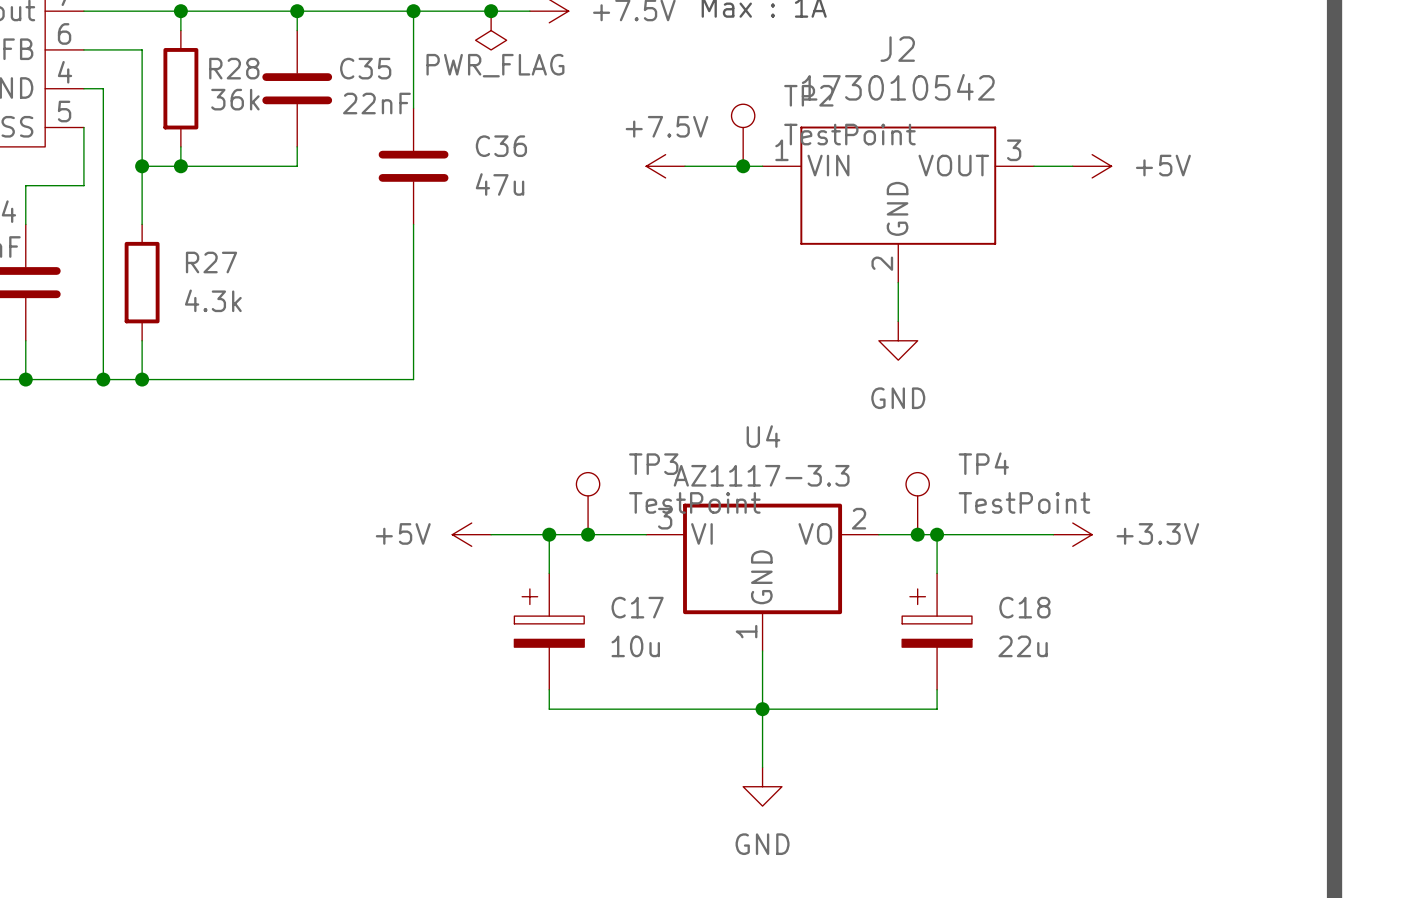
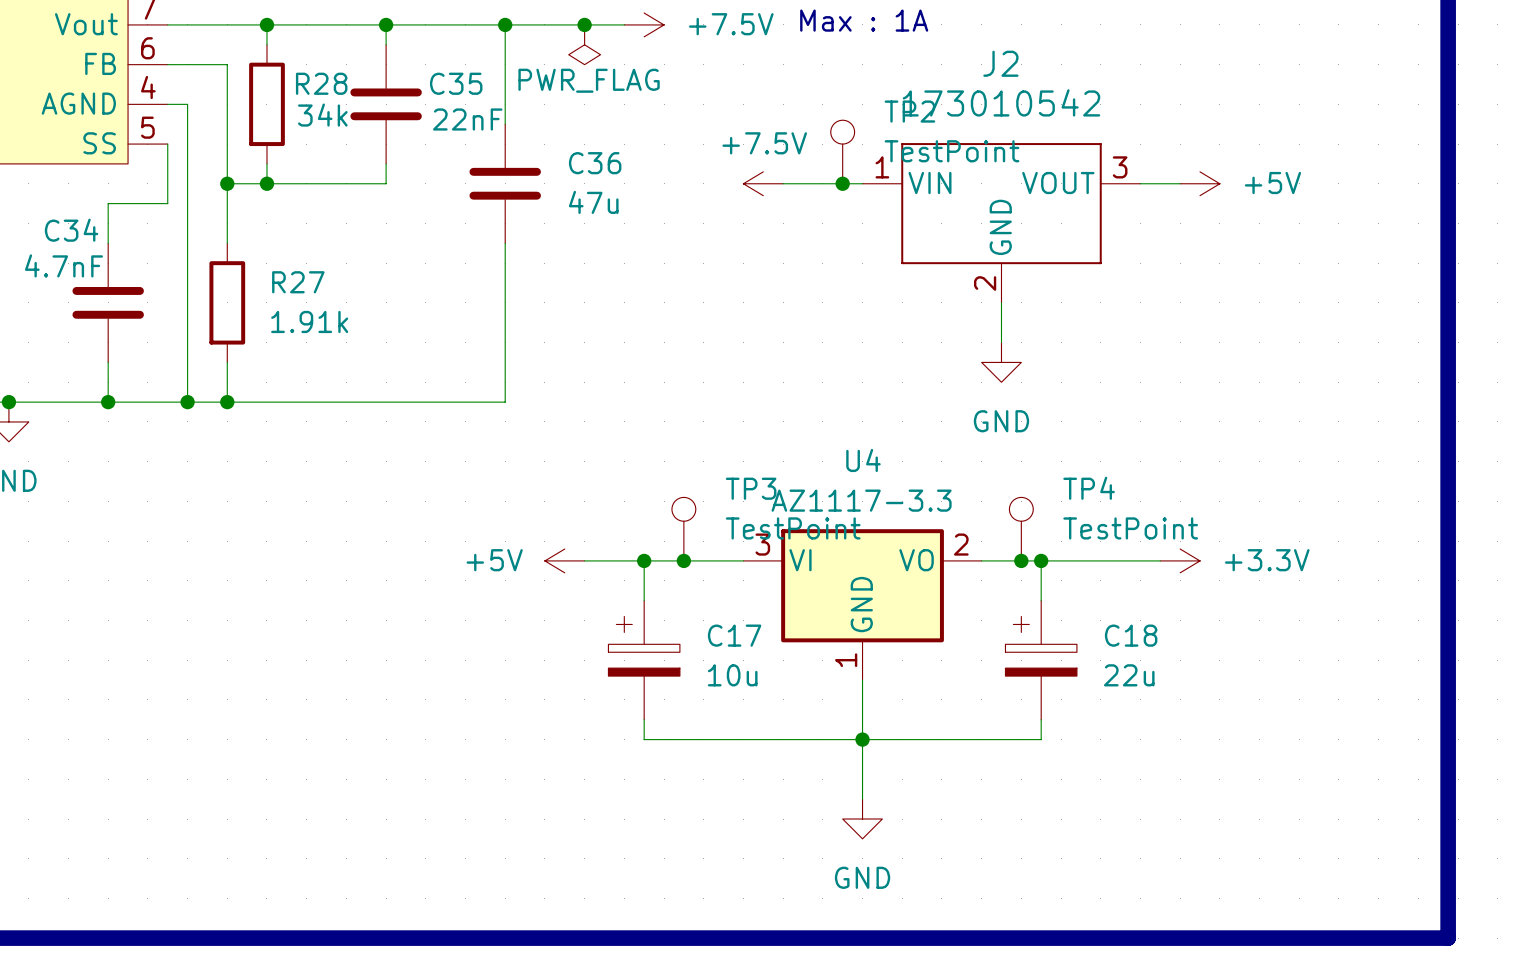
R28 value: 36k (235, 99) -> 34k (322, 115)
R27 value: 4.3k (213, 300) -> 1.91k (309, 321)

